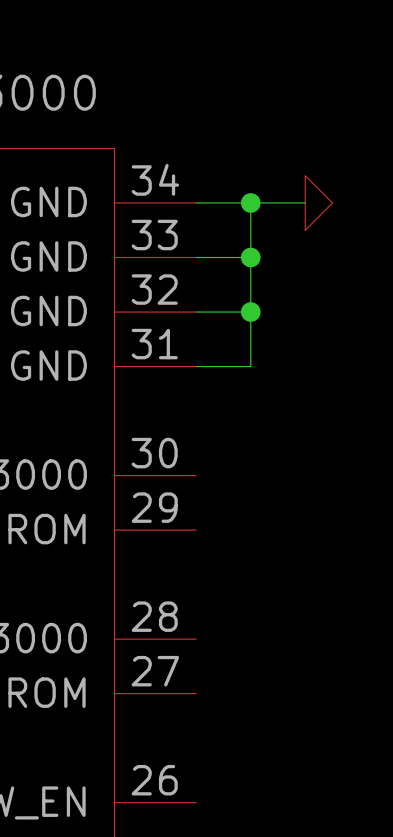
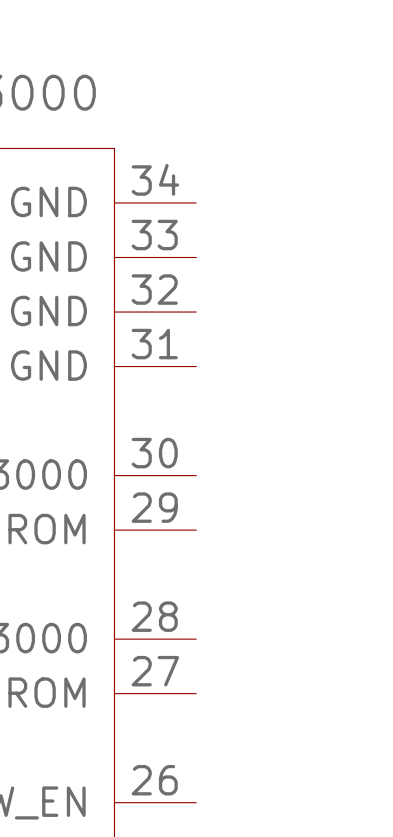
wire: (196, 202) (305, 202) -> none
wire: (250, 202) (250, 366) (196, 366) -> none
junction: (250, 202) -> none
power symbol: (318, 202) -> none
wire: (196, 257) (250, 257) -> none
junction: (250, 257) -> none
wire: (196, 312) (250, 312) -> none
junction: (250, 312) -> none

